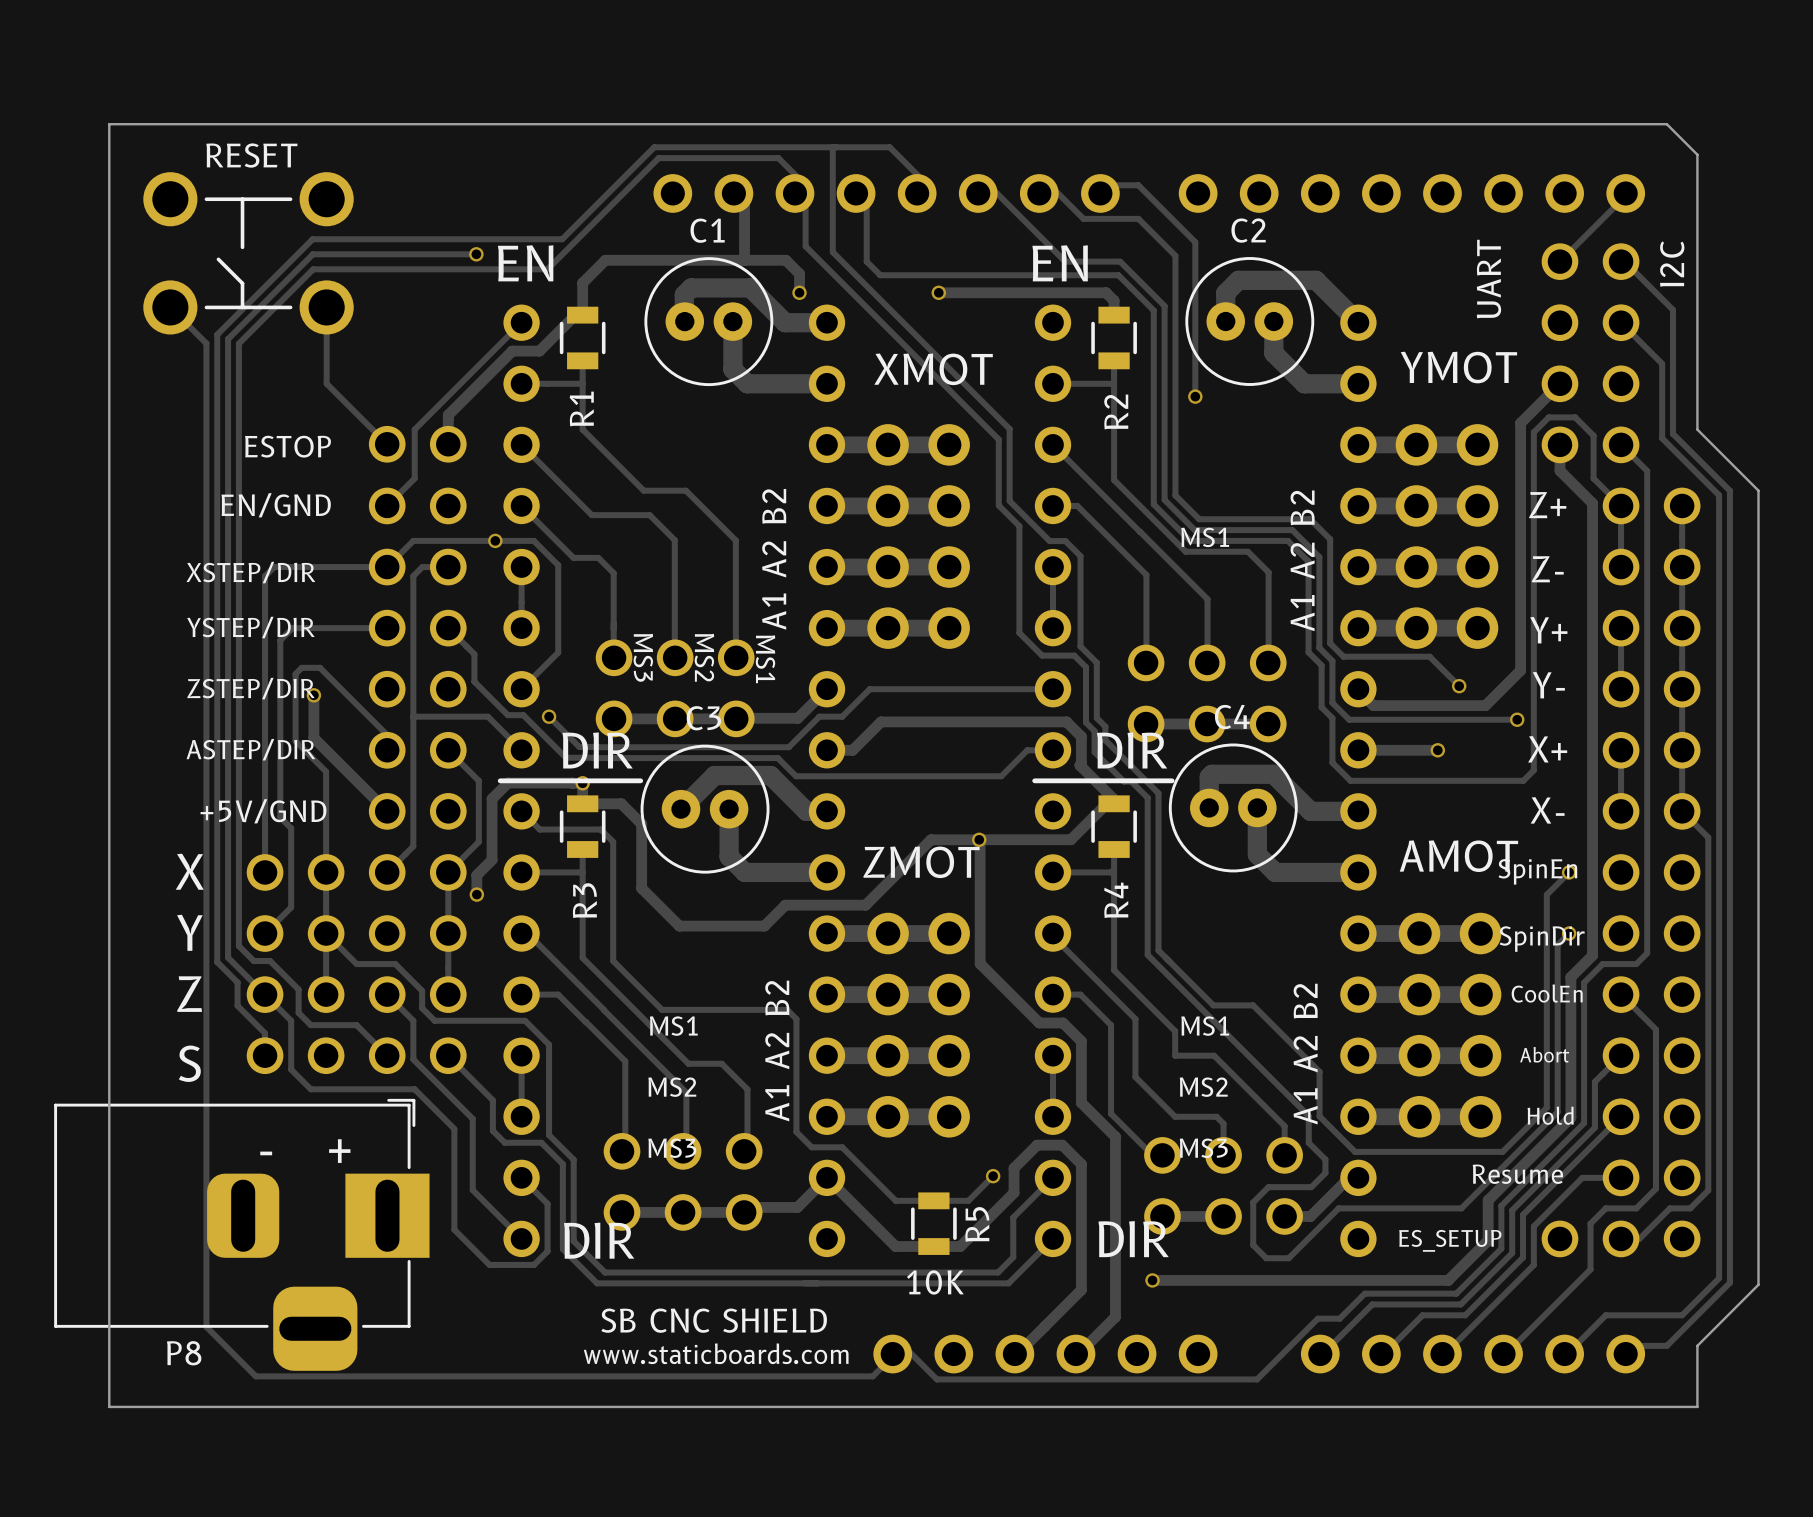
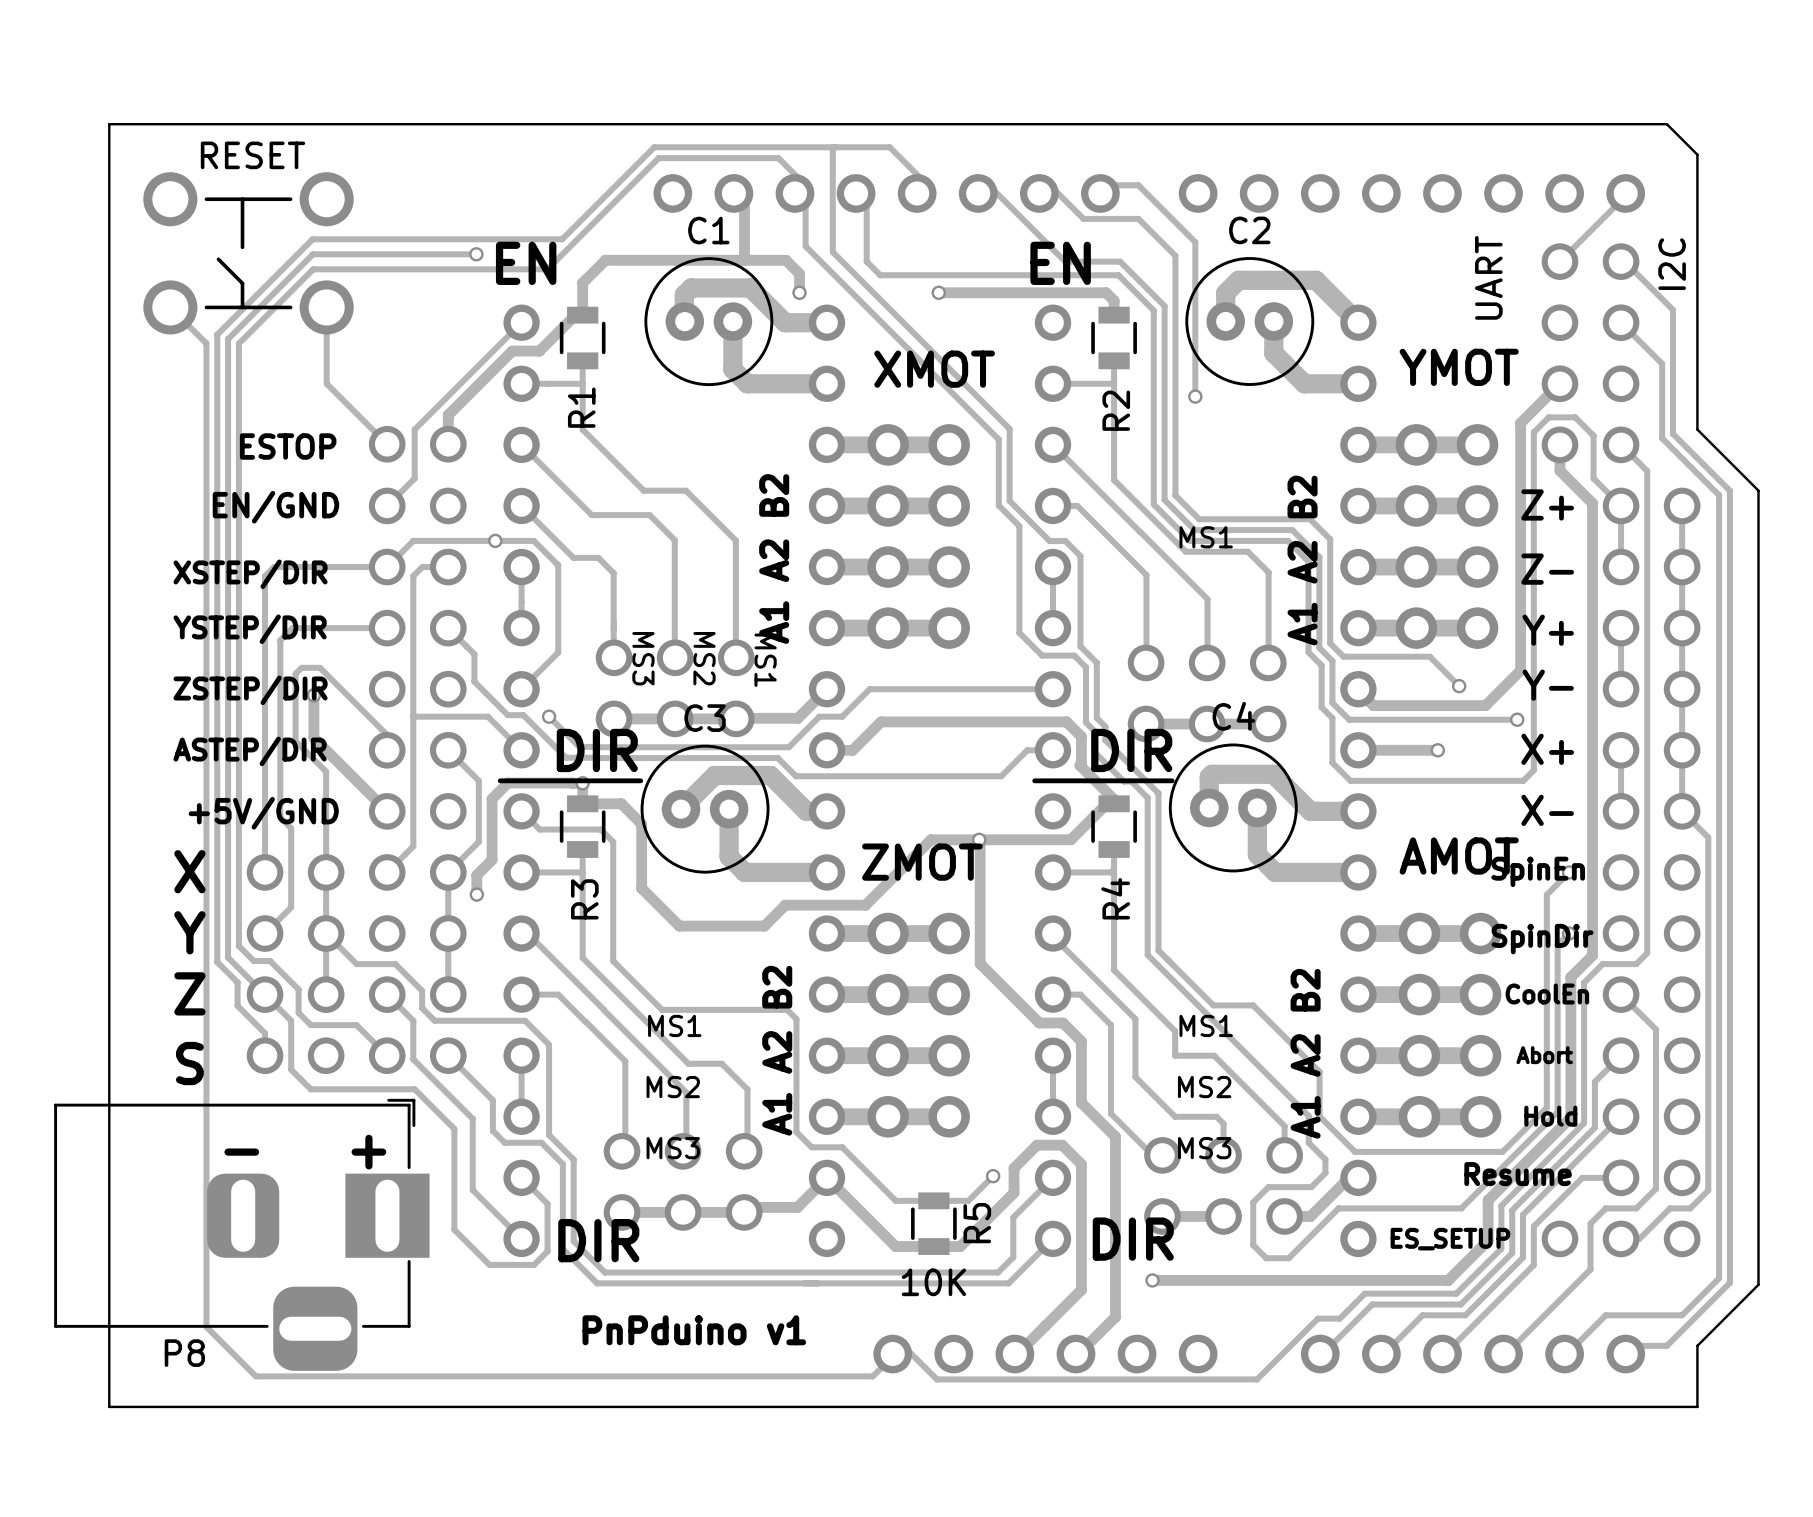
text: SB CNC SHIELD (714, 1320) -> none
text: none -> PnPduino v1 (694, 1330)
text: www.staticboards.com (716, 1353) -> none

